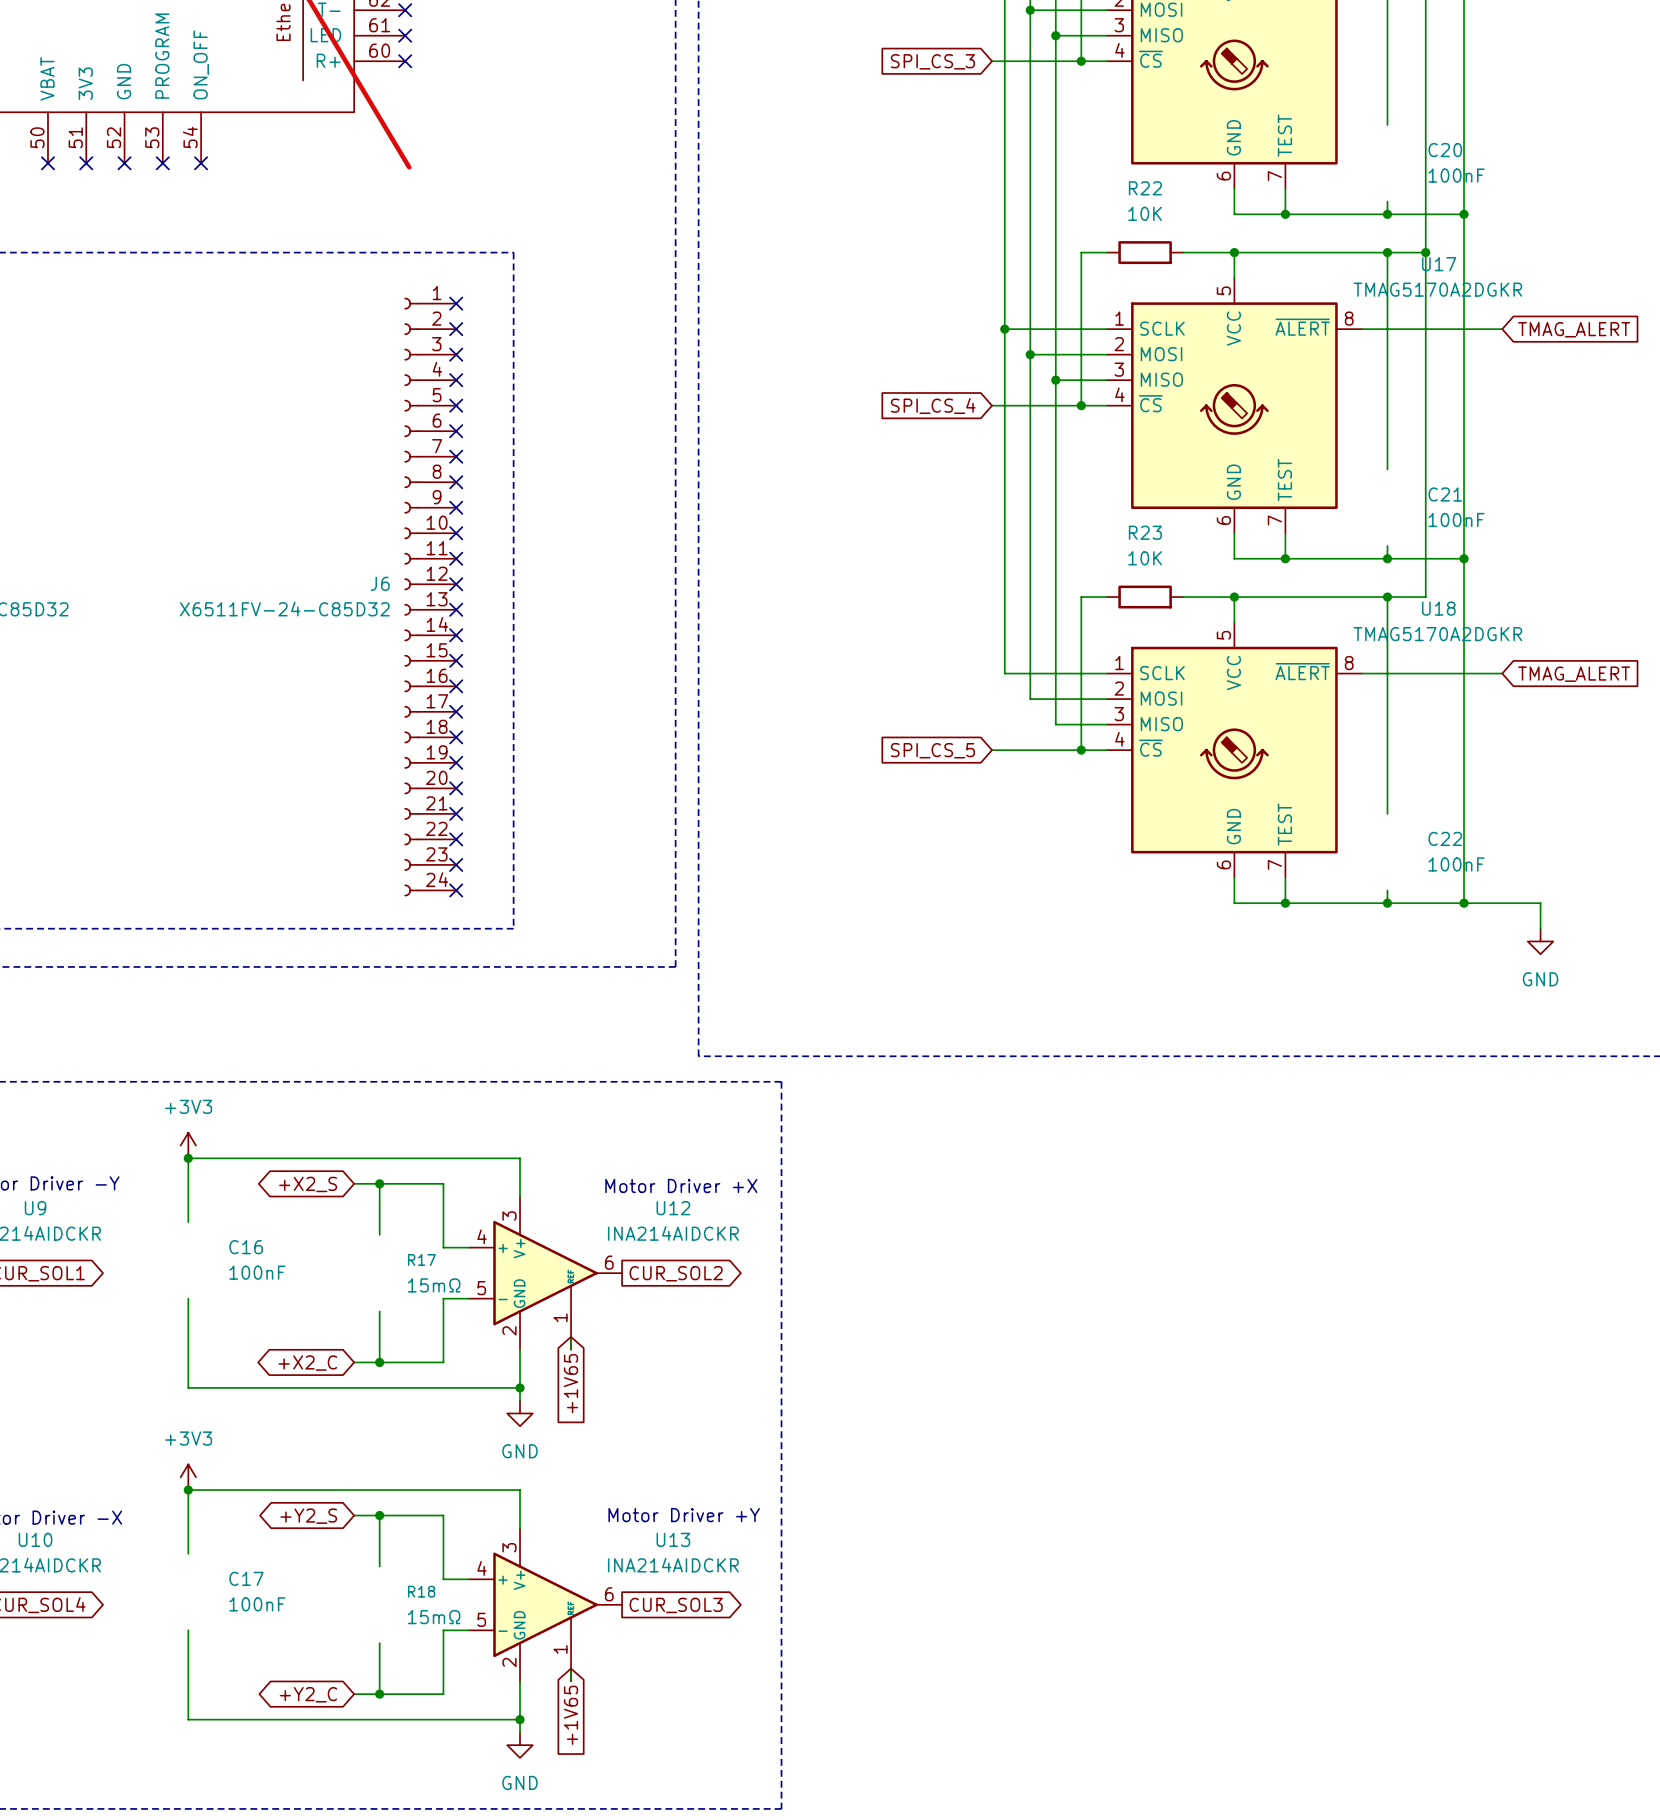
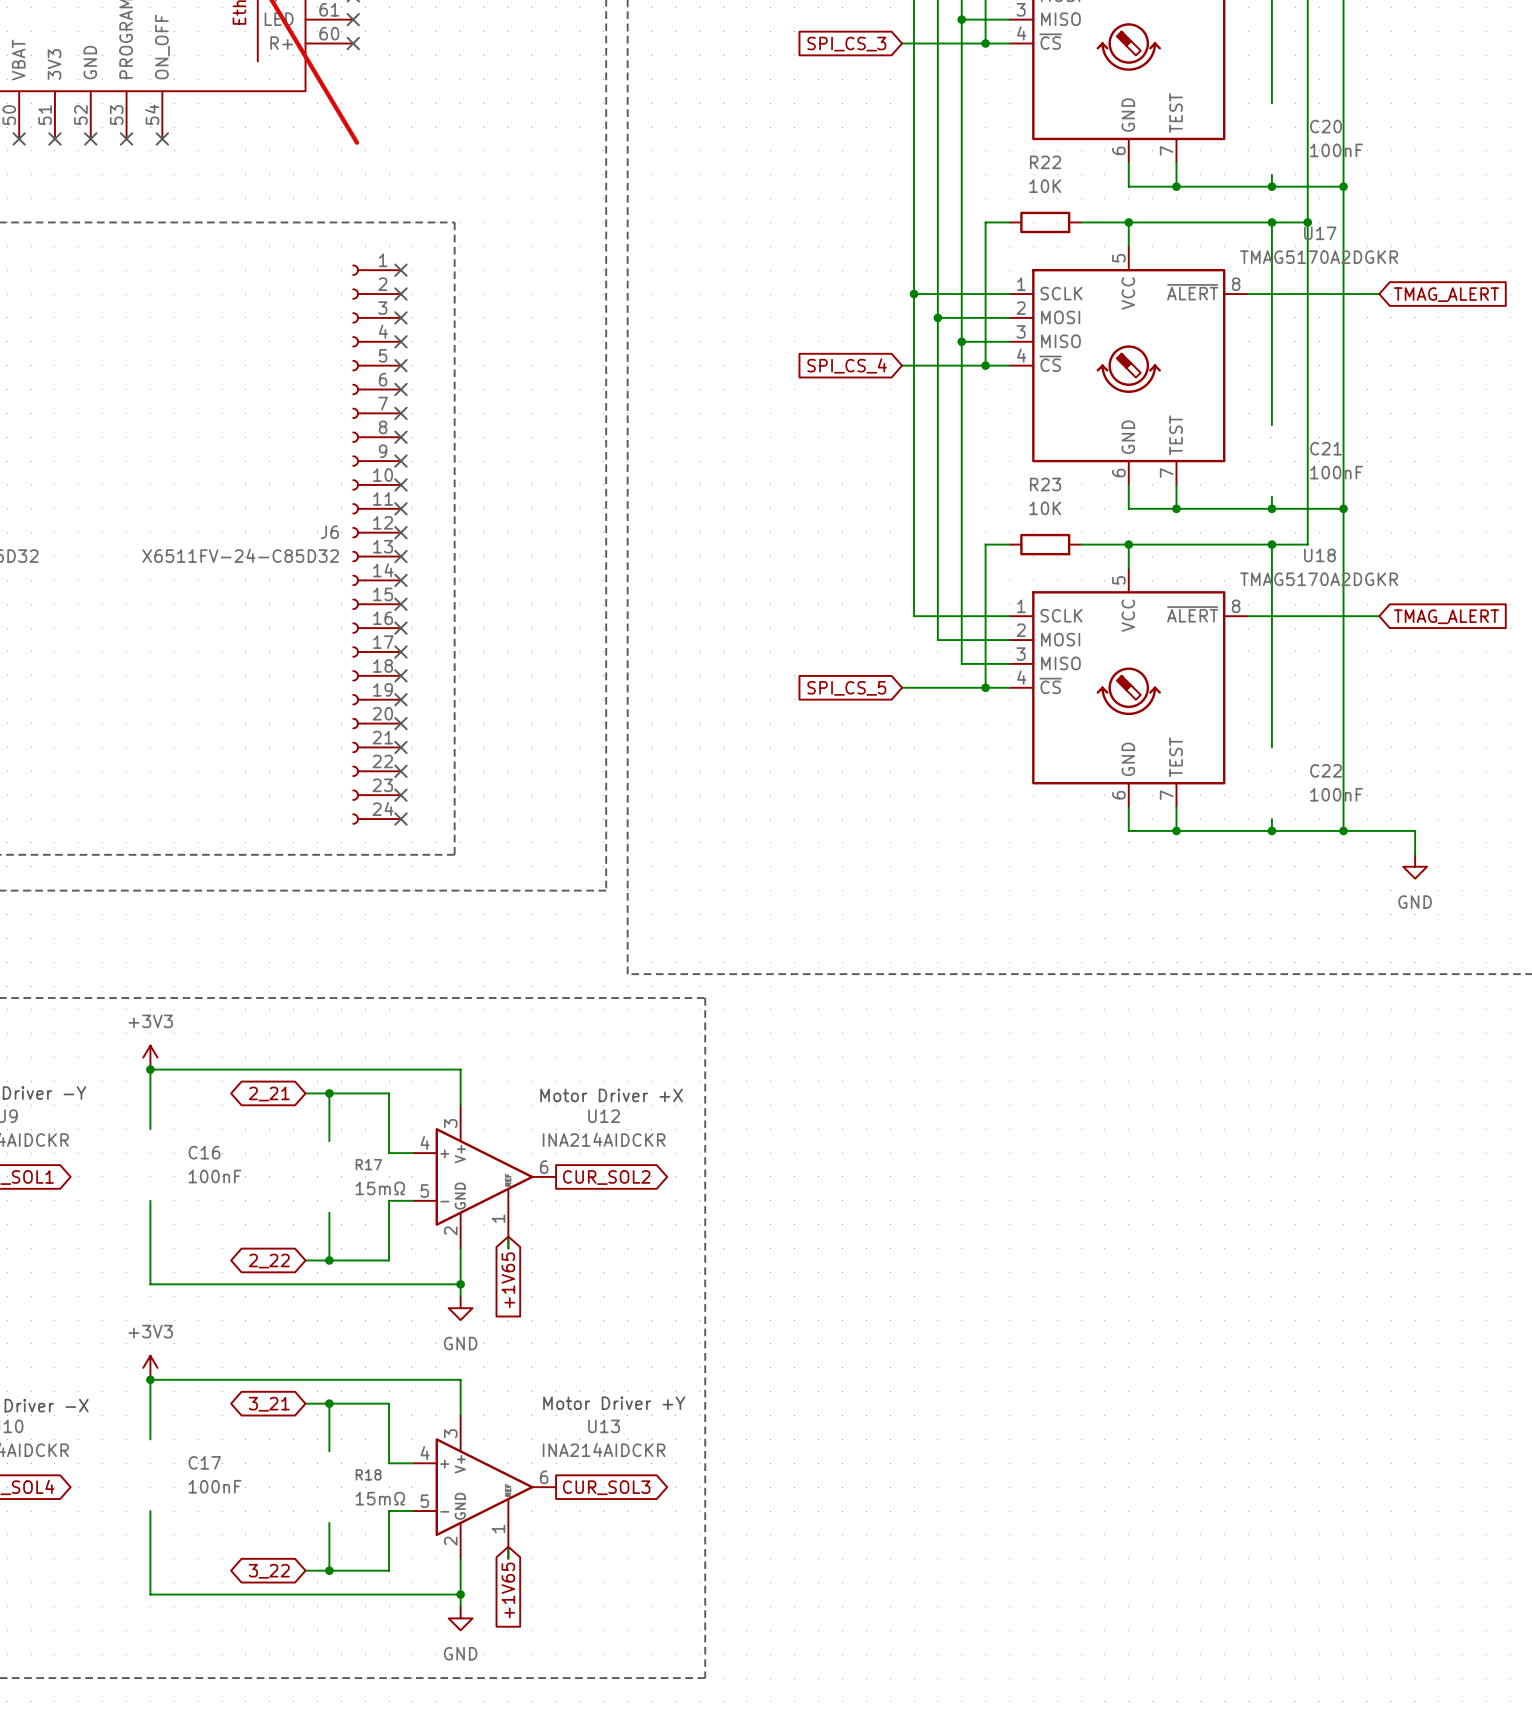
global label: +X2_S (308, 1184) -> 2_21 (269, 1094)
global label: +X2_C (307, 1363) -> 2_22 (269, 1261)
global label: +Y2_S (308, 1516) -> 3_21 (269, 1404)
global label: +Y2_C (308, 1694) -> 3_22 (269, 1571)

